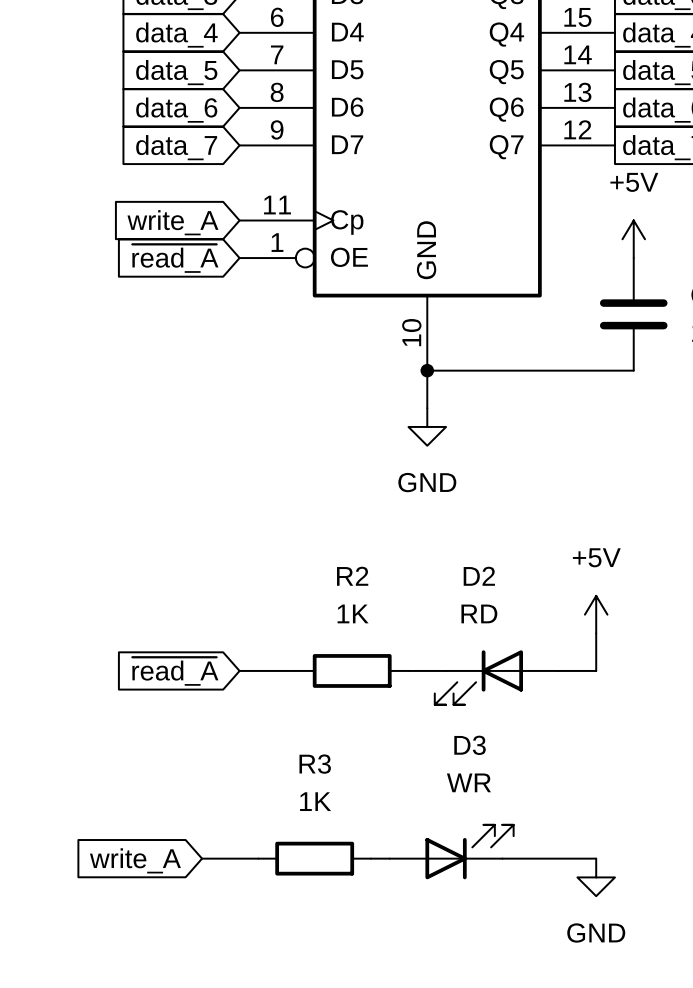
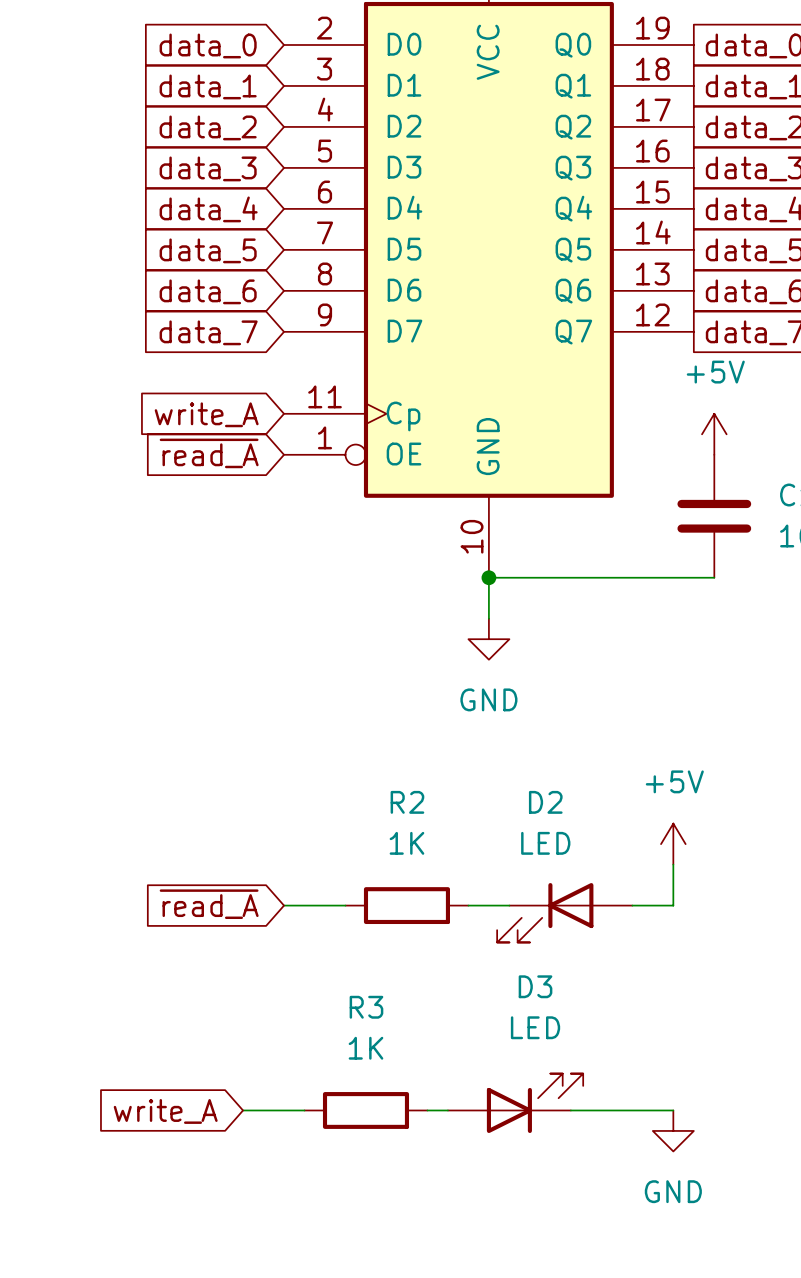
D2 value: RD (479, 613) -> LED (545, 843)
D3 value: WR (468, 782) -> LED (535, 1027)

